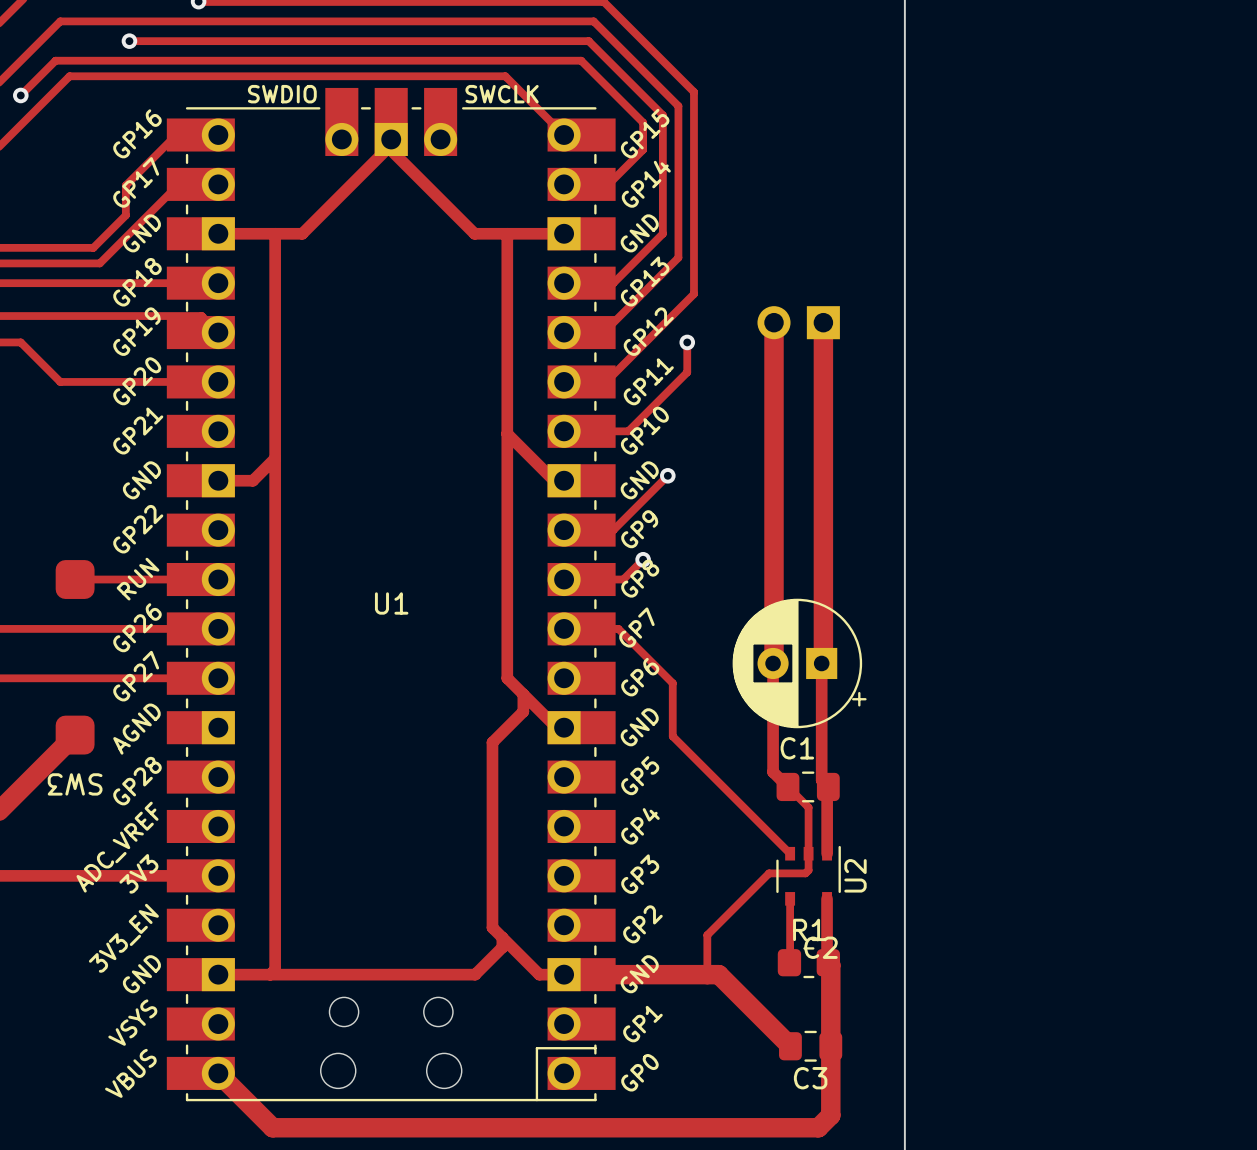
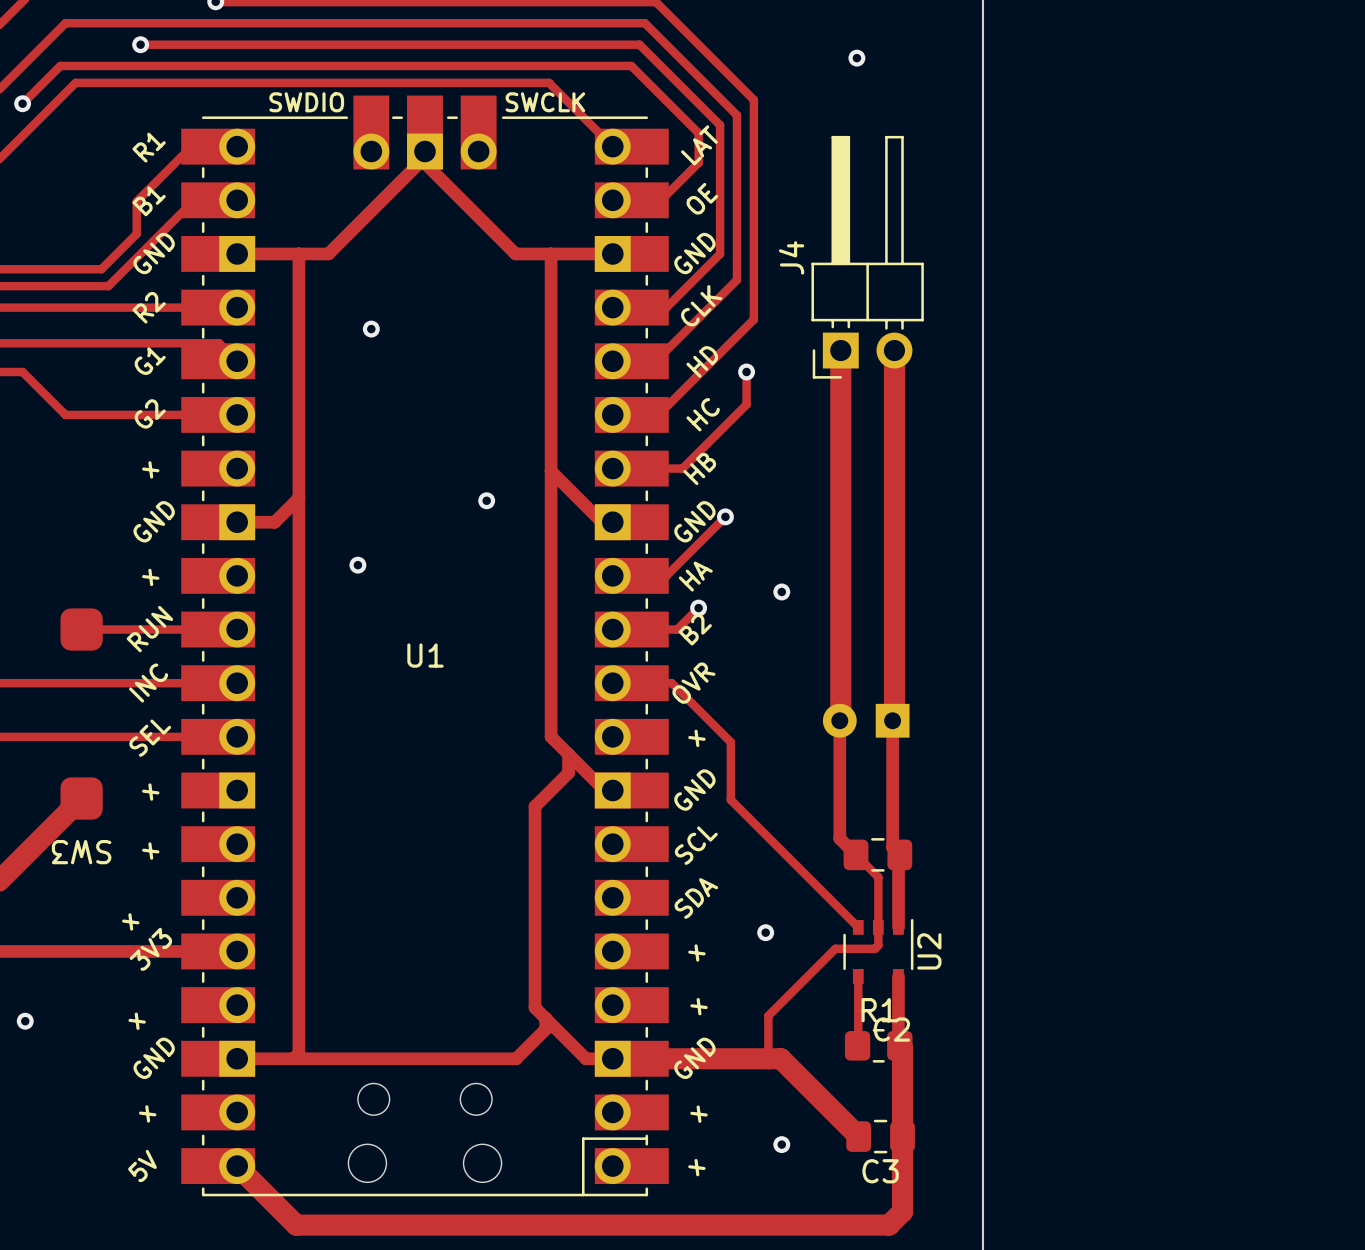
via: none -> (856, 58)
U1 footprint: [166, 87, 616, 1102] -> [181, 95, 669, 1197]
via: none -> (371, 329)
J4 side: bottom (798, 322) -> top (867, 257)
via: none -> (486, 500)
via: none -> (357, 565)
via: none -> (781, 591)
C1 side: top (799, 663) -> bottom (866, 720)
via: none -> (765, 932)
via: none -> (25, 1021)
via: none -> (781, 1144)

